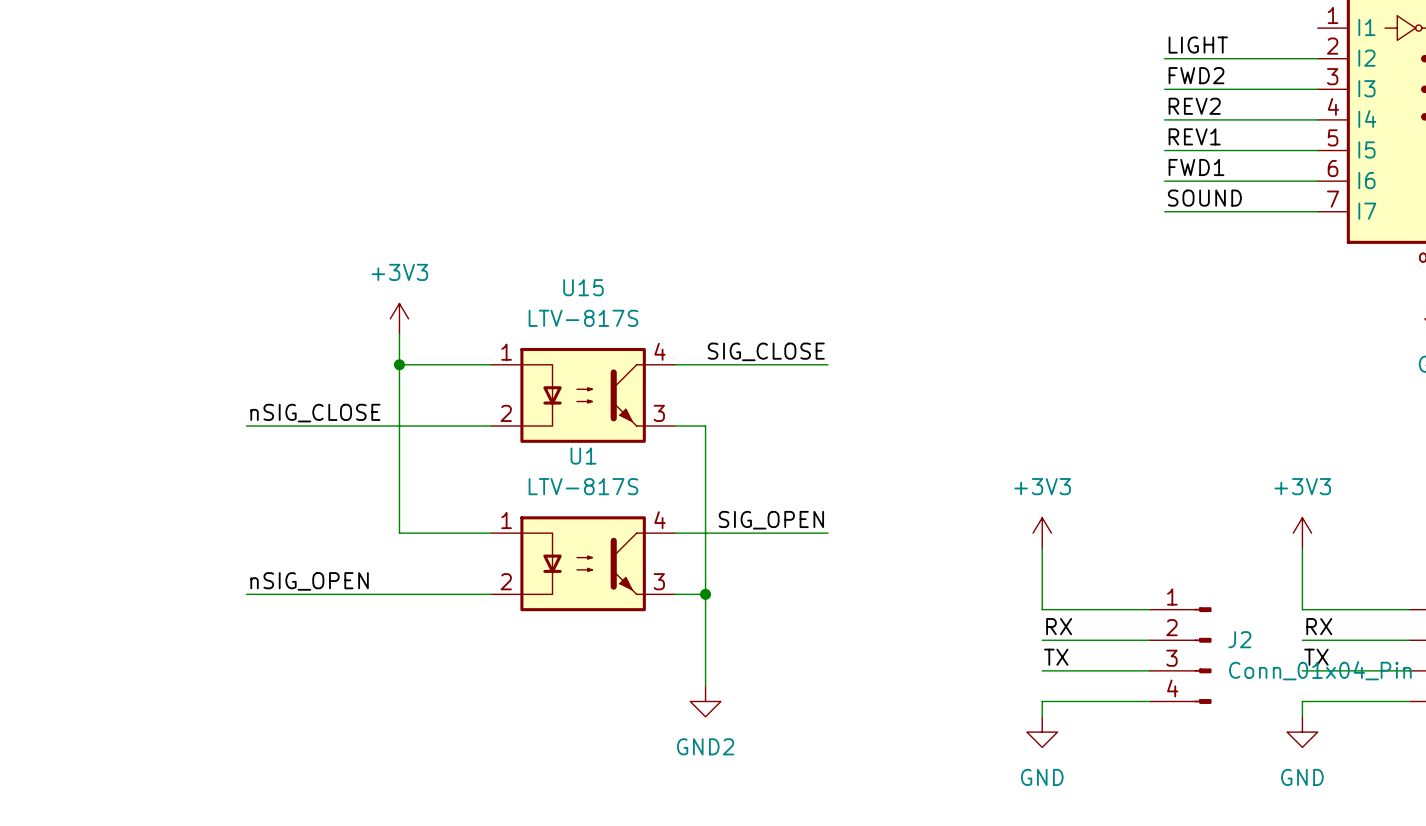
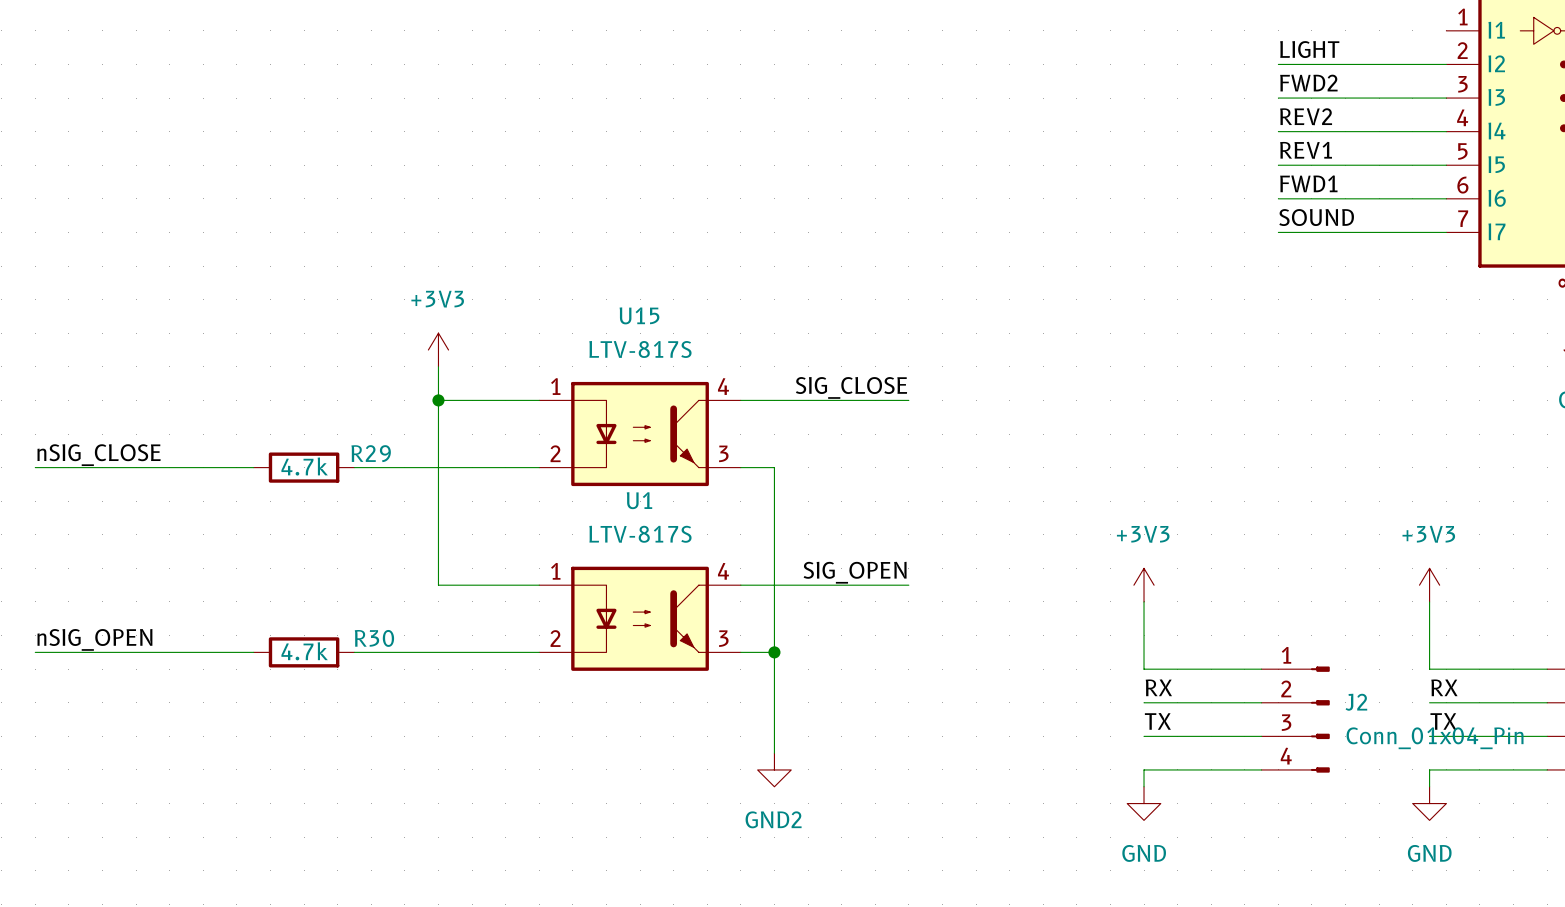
label position: nSIG_CLOSE (315, 413) -> nSIG_CLOSE (99, 455)
wire: none -> (35, 467) (253, 467)
wire: (246, 426) (322, 426) -> none
R29: none -> (304, 467)
label position: nSIG_OPEN (309, 581) -> nSIG_OPEN (94, 639)
wire: none -> (35, 652) (253, 652)
wire: (246, 594) (322, 594) -> none
R30: none -> (304, 652)

